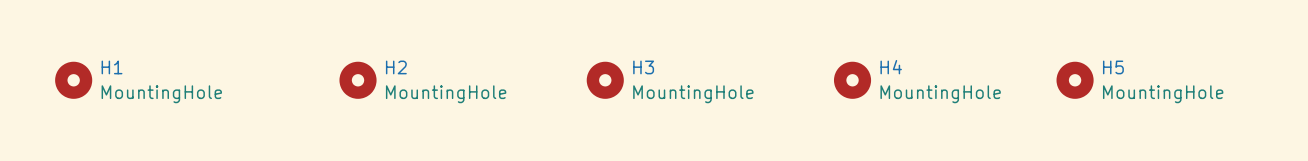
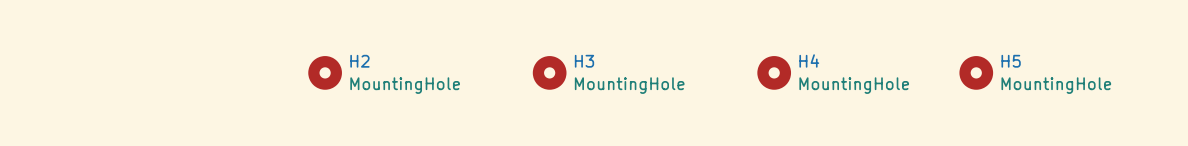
H1: MountingHole (73, 80) -> none

